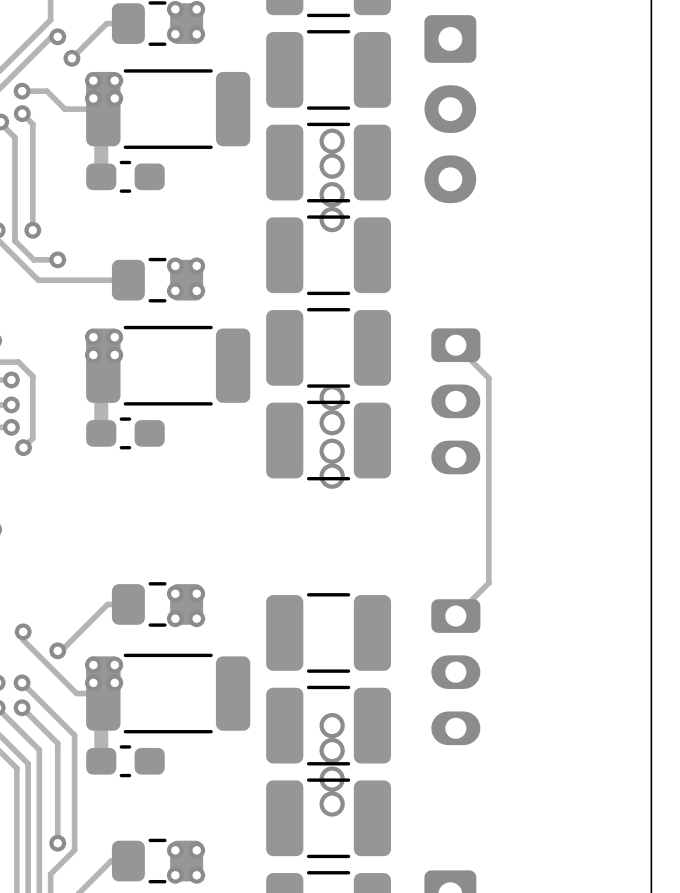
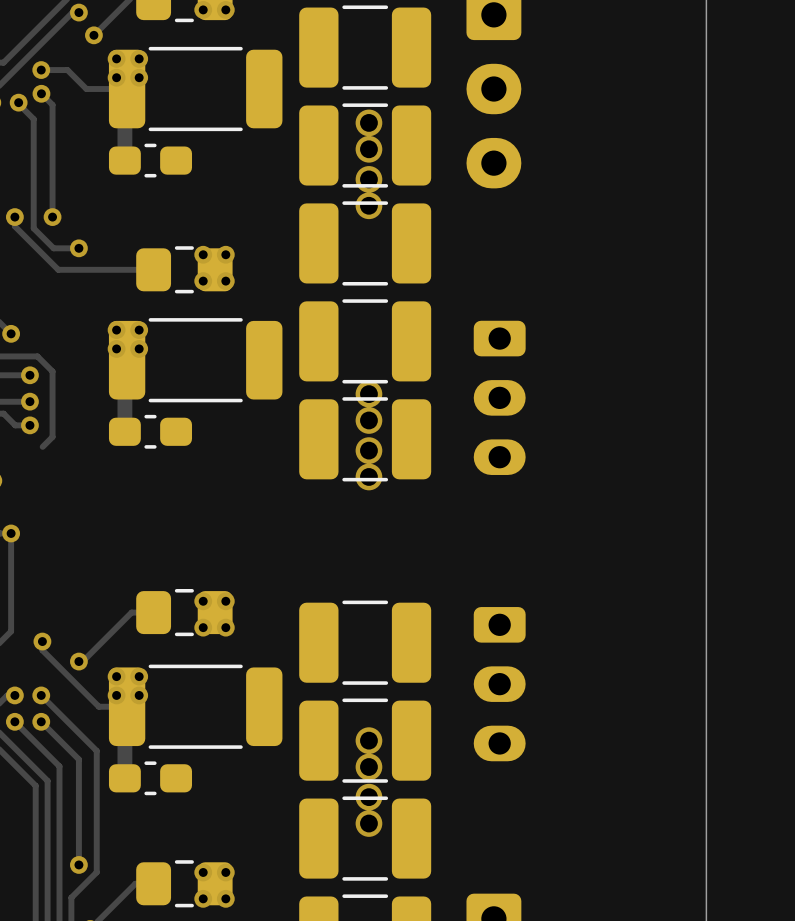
track: (455, 345) (488, 378) (488, 583) (455, 616) -> none
via: (23, 447) -> none

